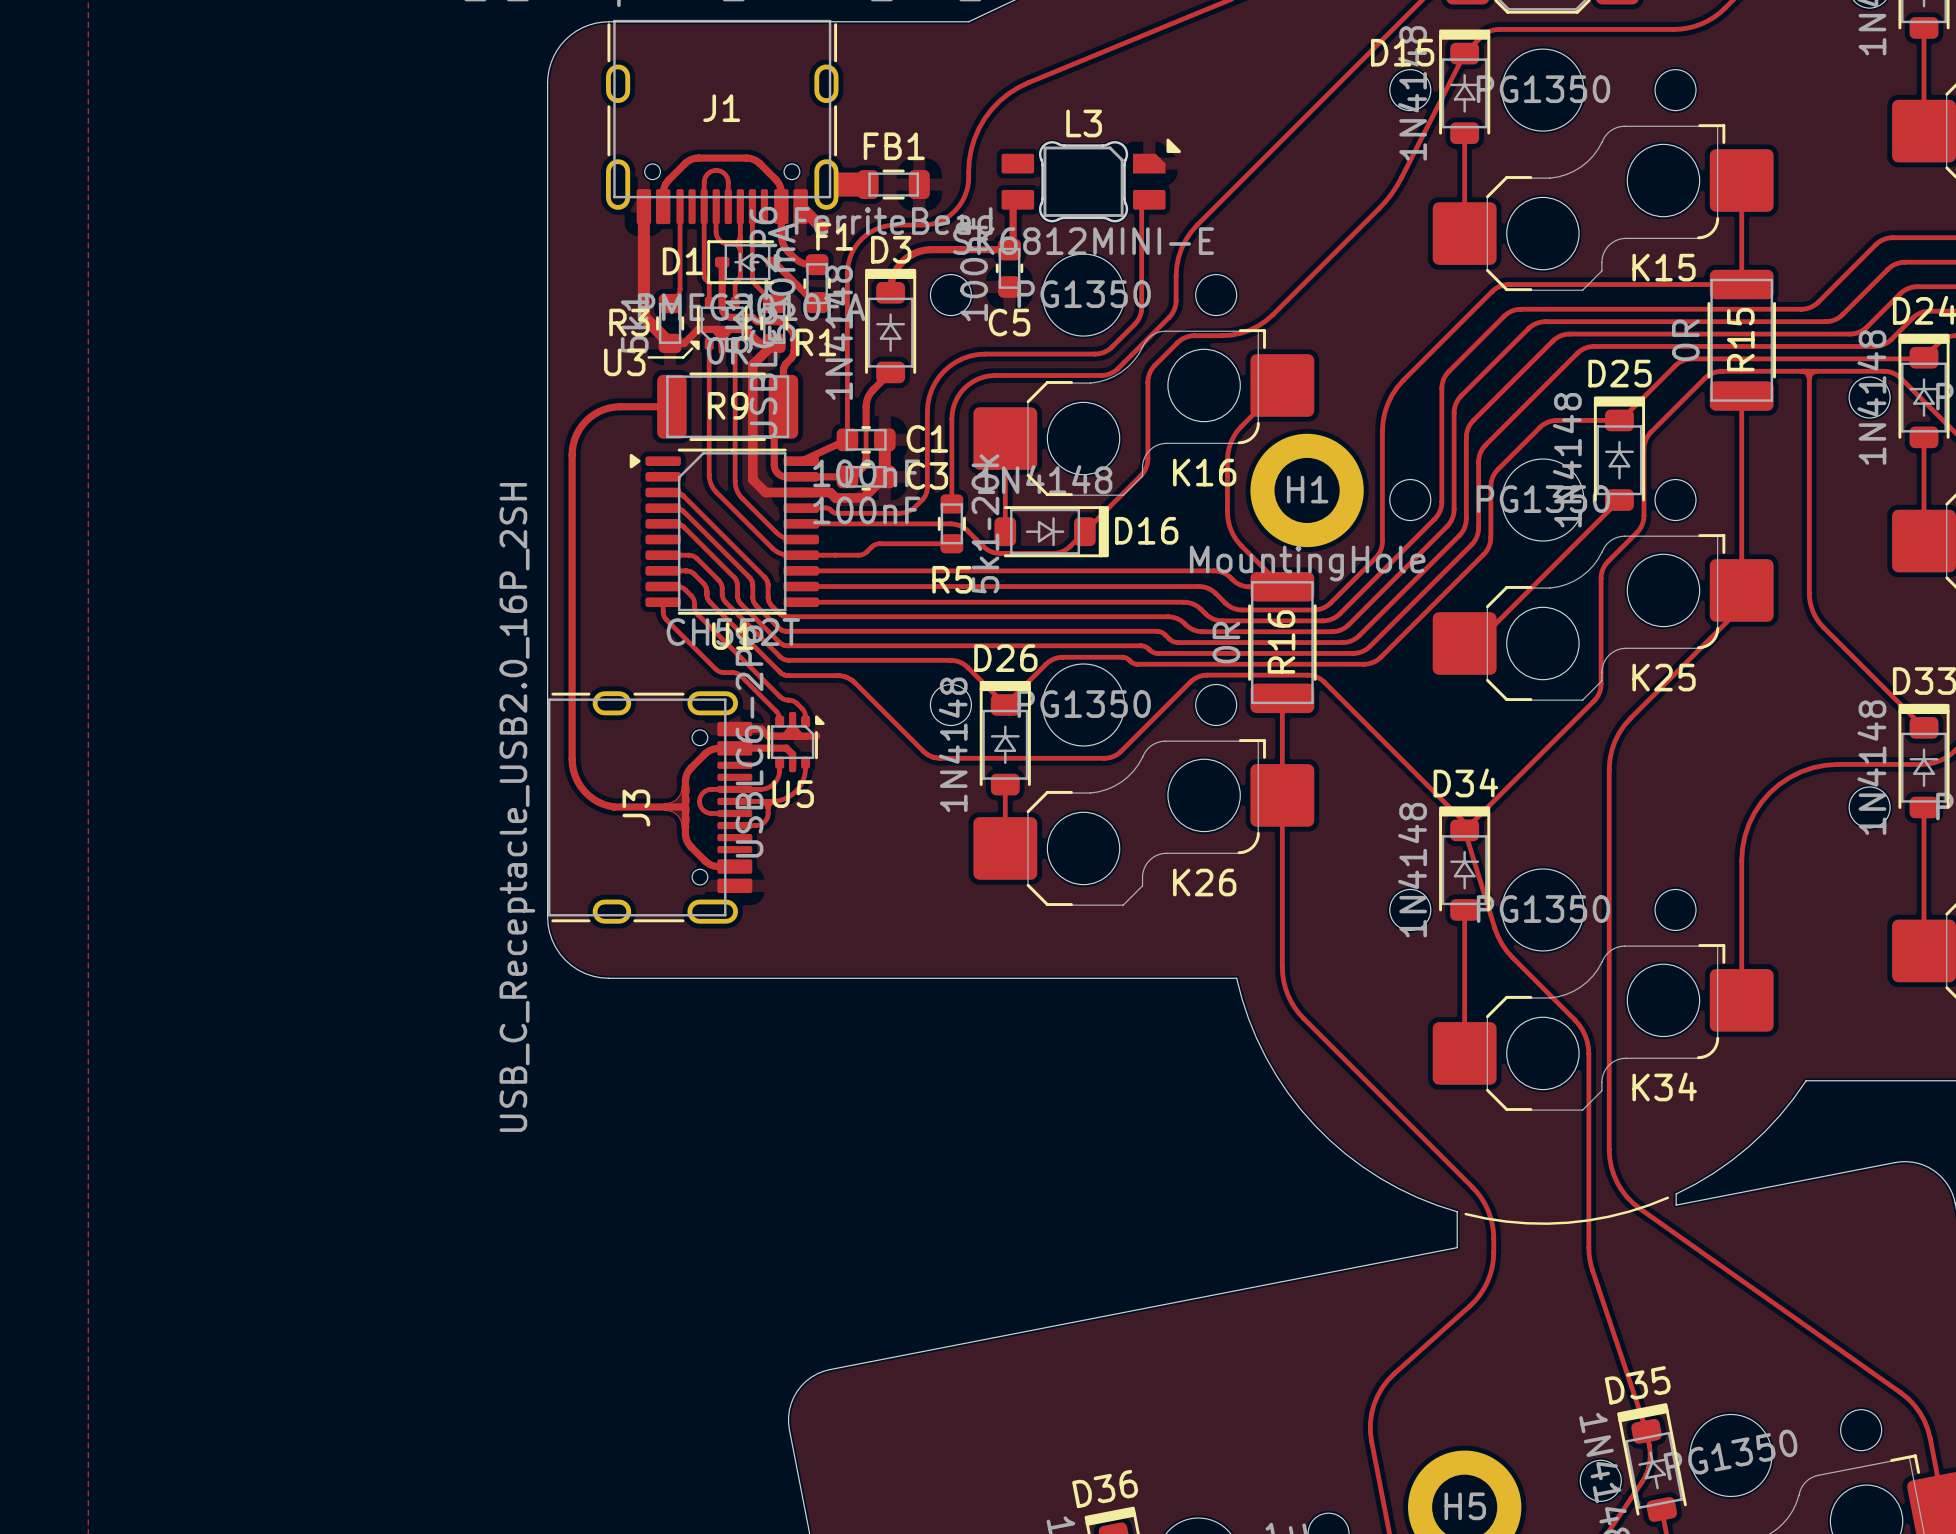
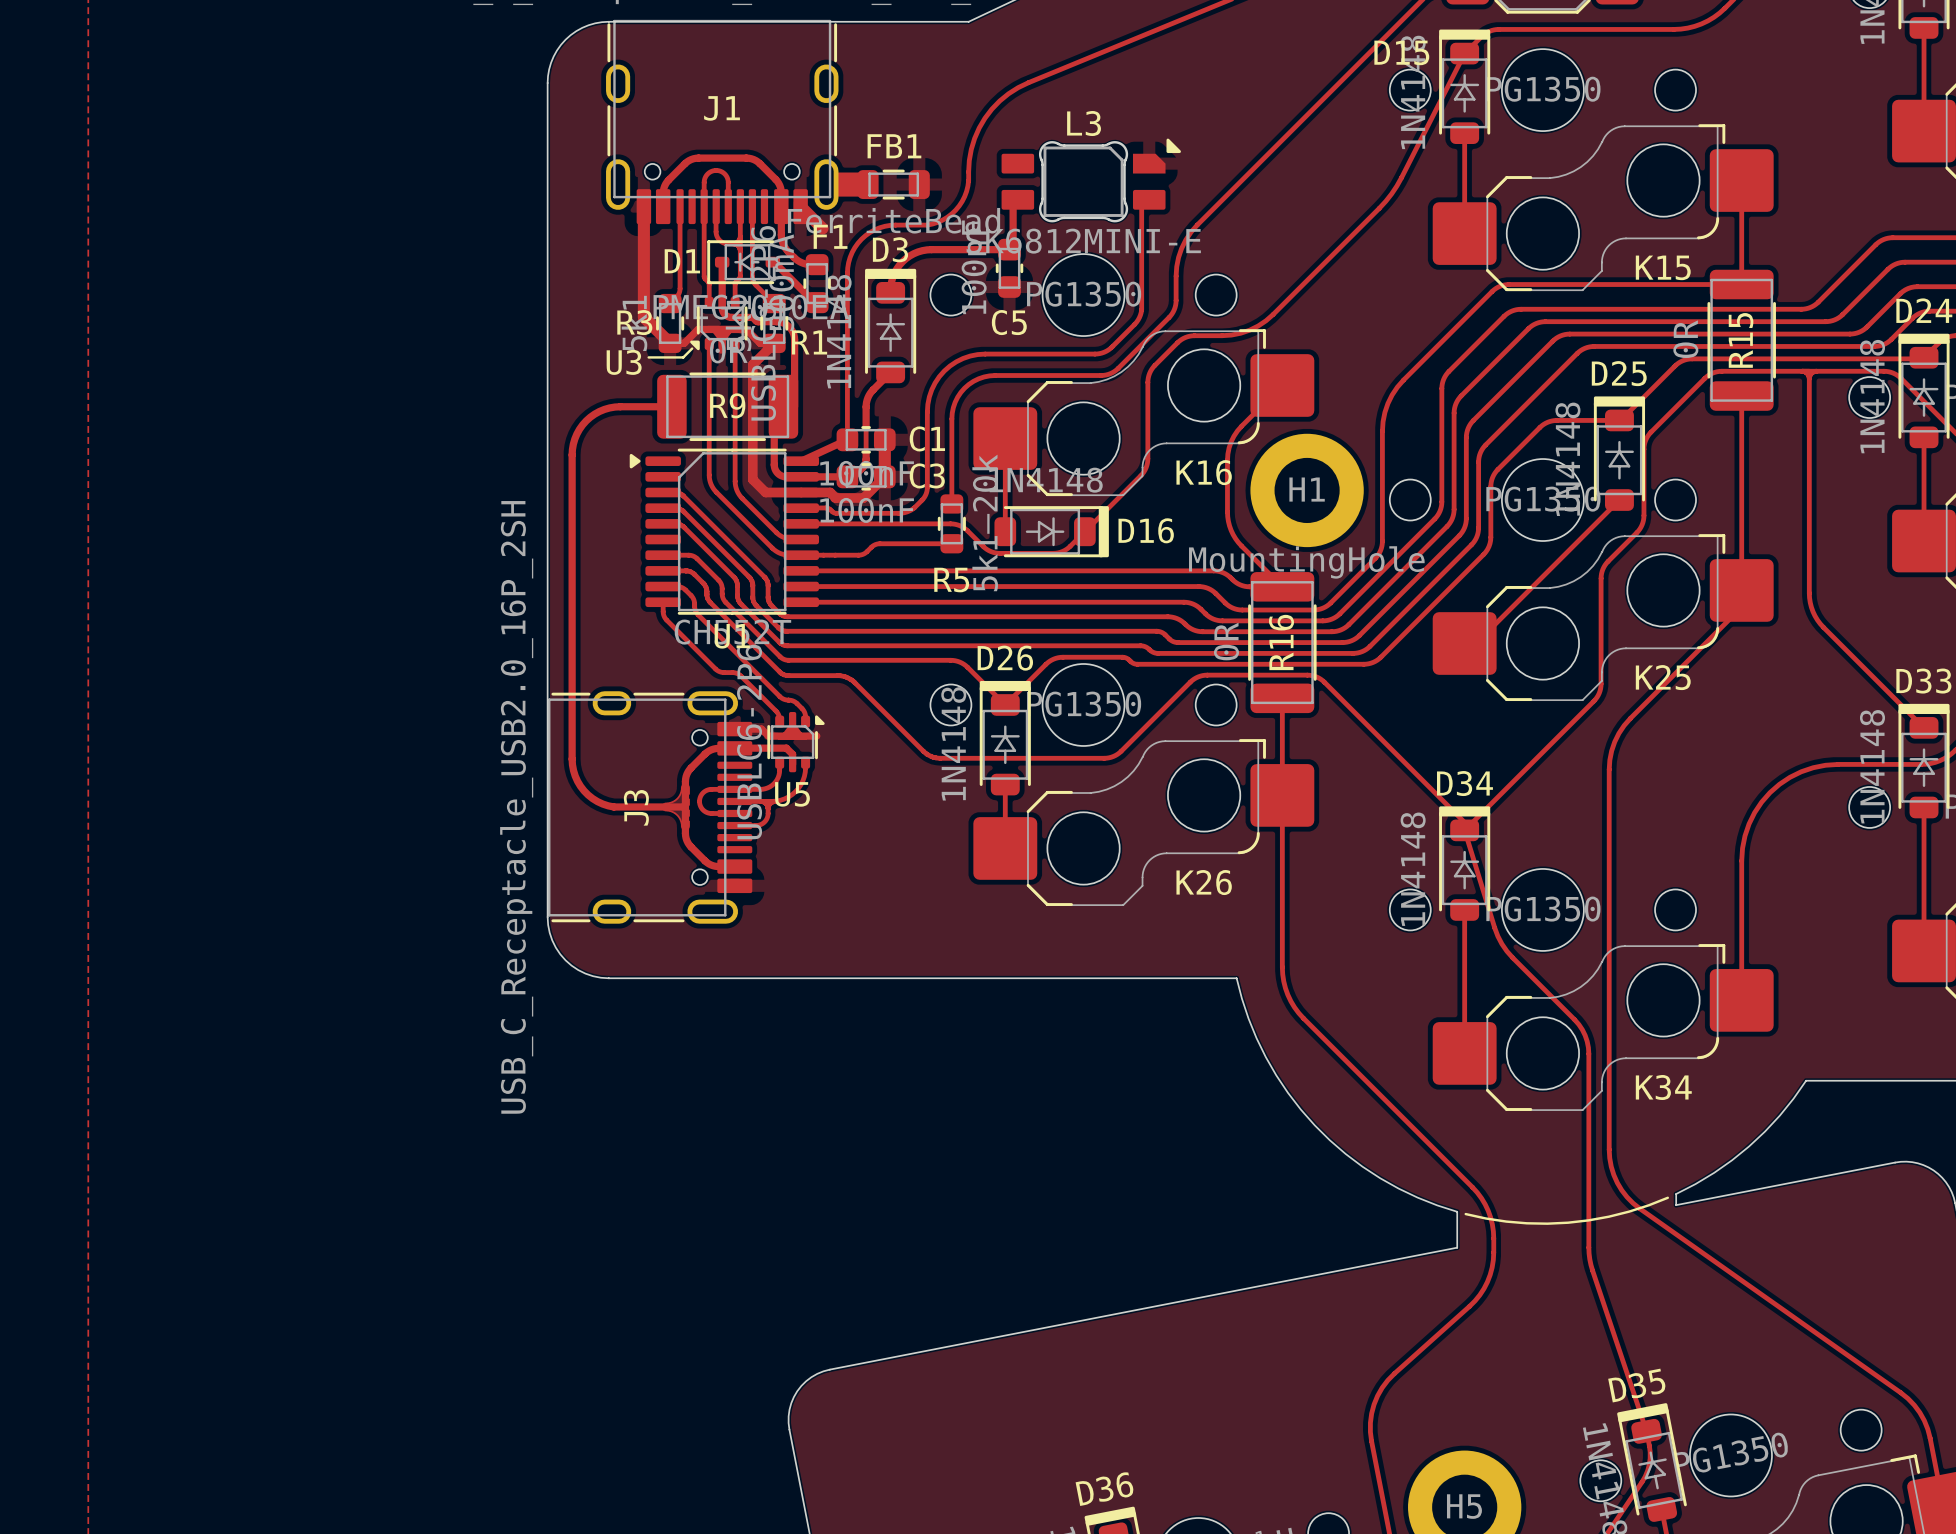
top track: (776, 321) (785, 324) (794, 336) (793, 355) (783, 369) (783, 396) -> (776, 321) (787, 325) (793, 335) (794, 406)

